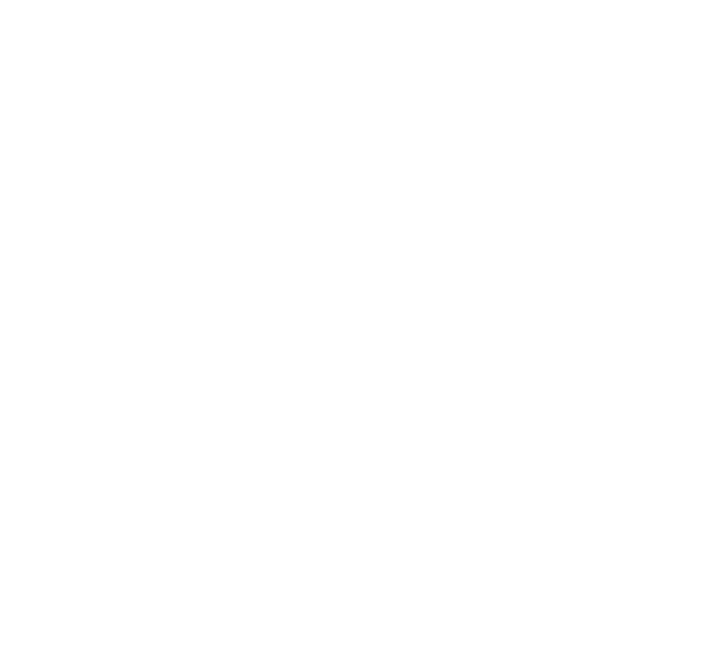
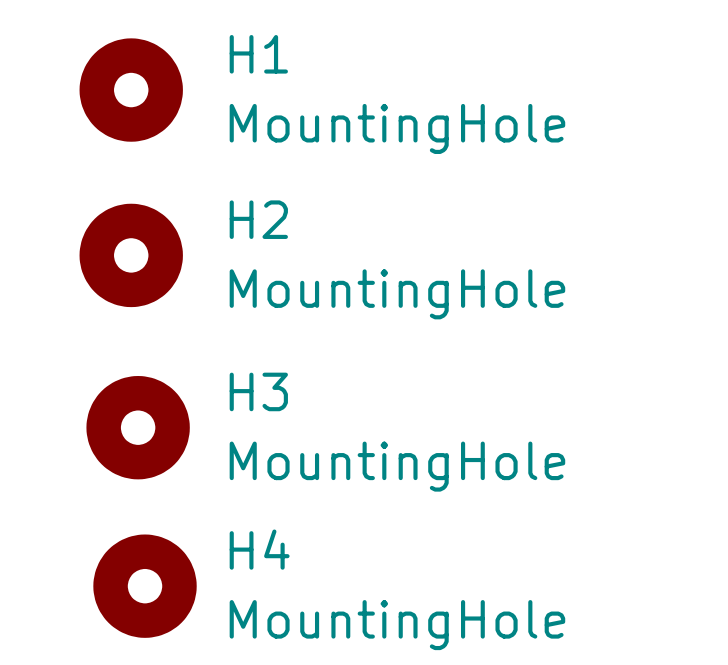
H1: none -> MountingHole (131, 90)
H2: none -> MountingHole (131, 255)
H3: none -> MountingHole (138, 427)
H4: none -> MountingHole (145, 586)

